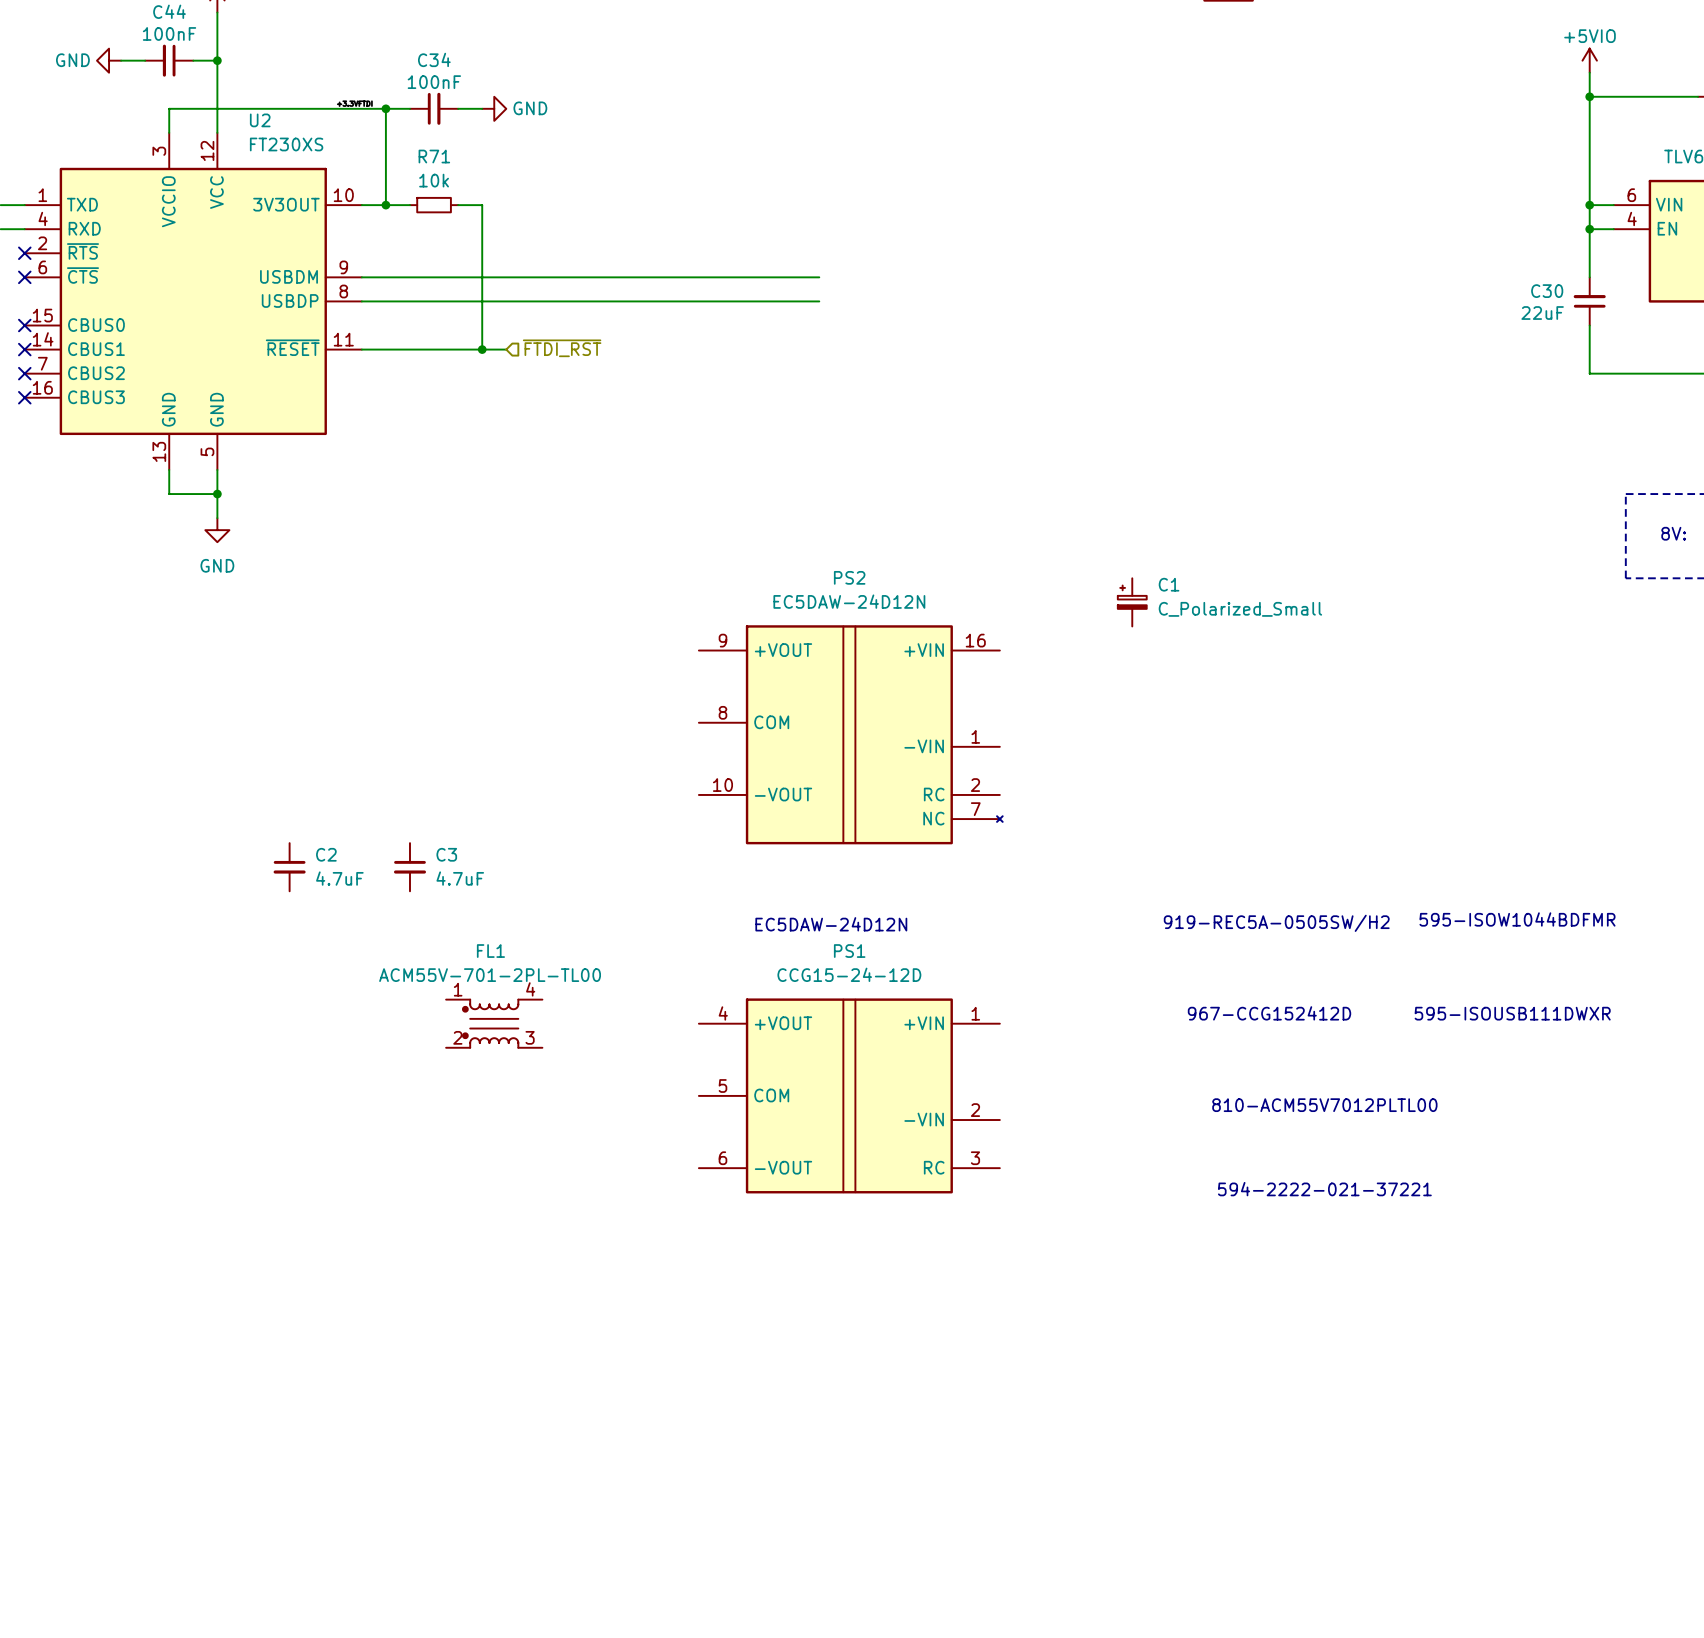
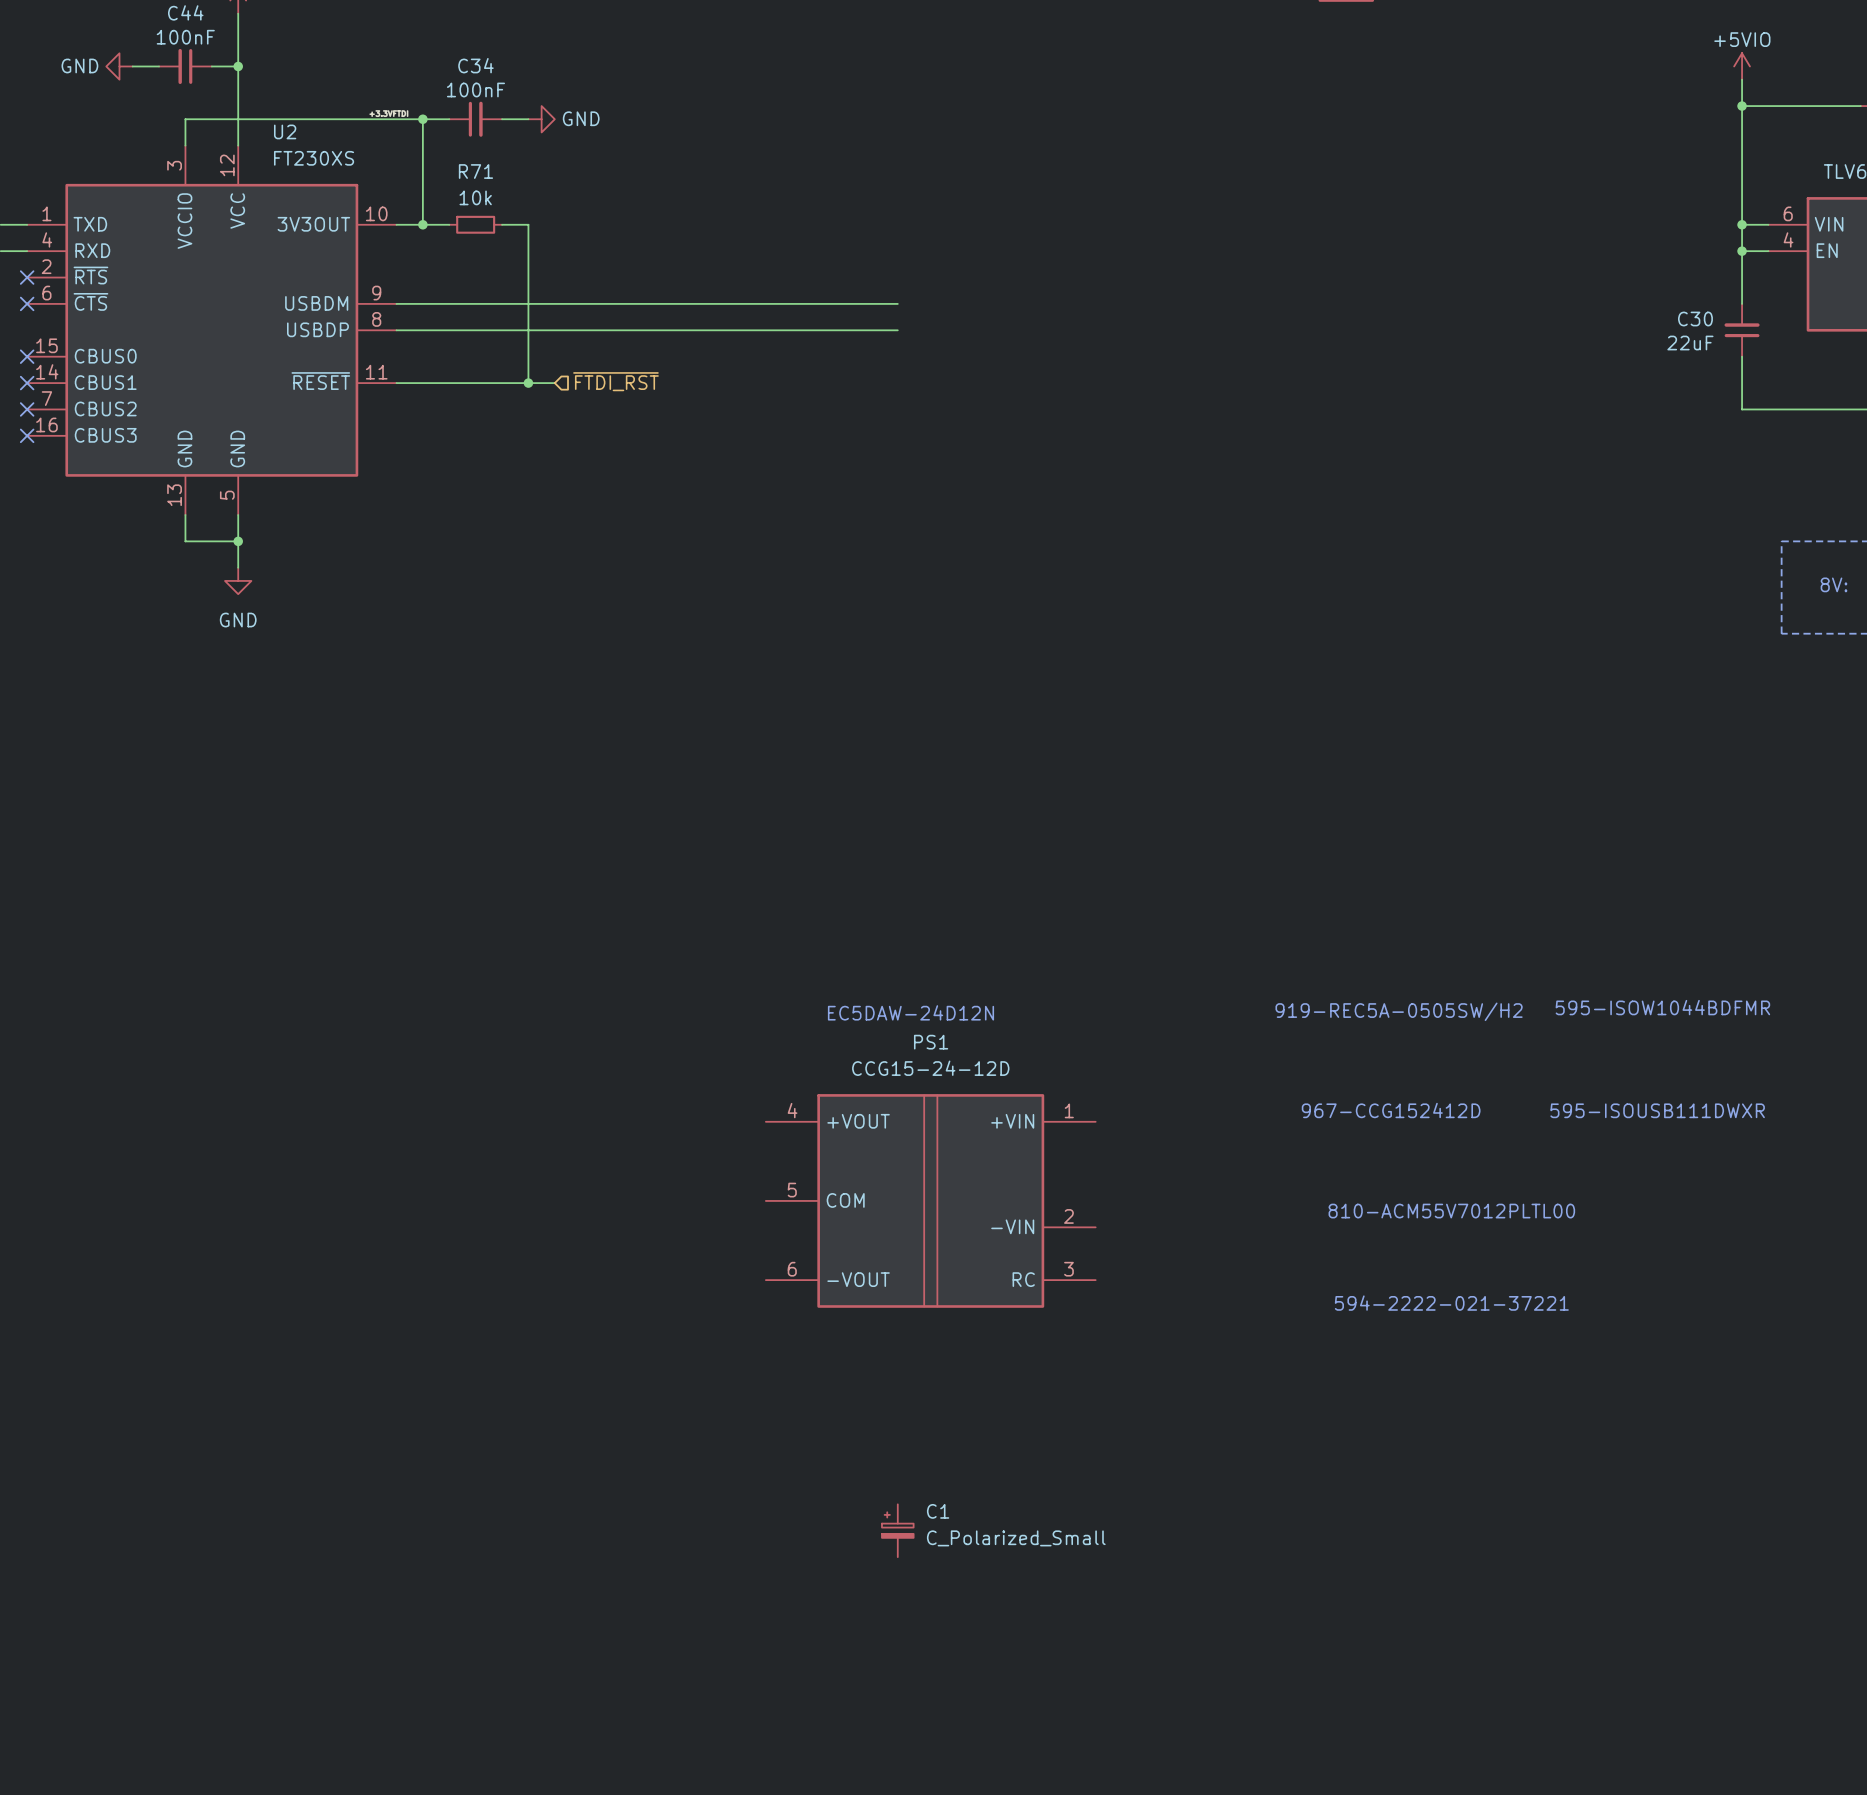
C1 position: (1132, 602) -> (897, 1530)
PS2: EC5DAW-24D12N (850, 734) -> none
C2: 4.7uF (289, 867) -> none
C3: 4.7uF (409, 867) -> none
FL1: ACM55V-701-2PL-TL00 (494, 1023) -> none

